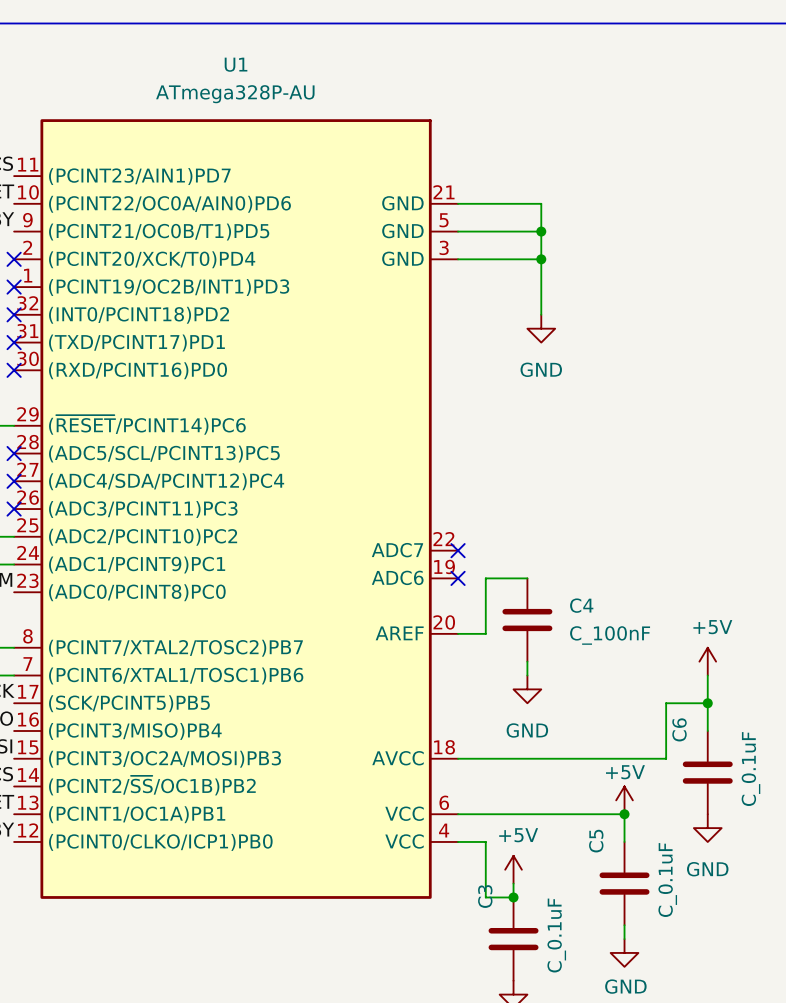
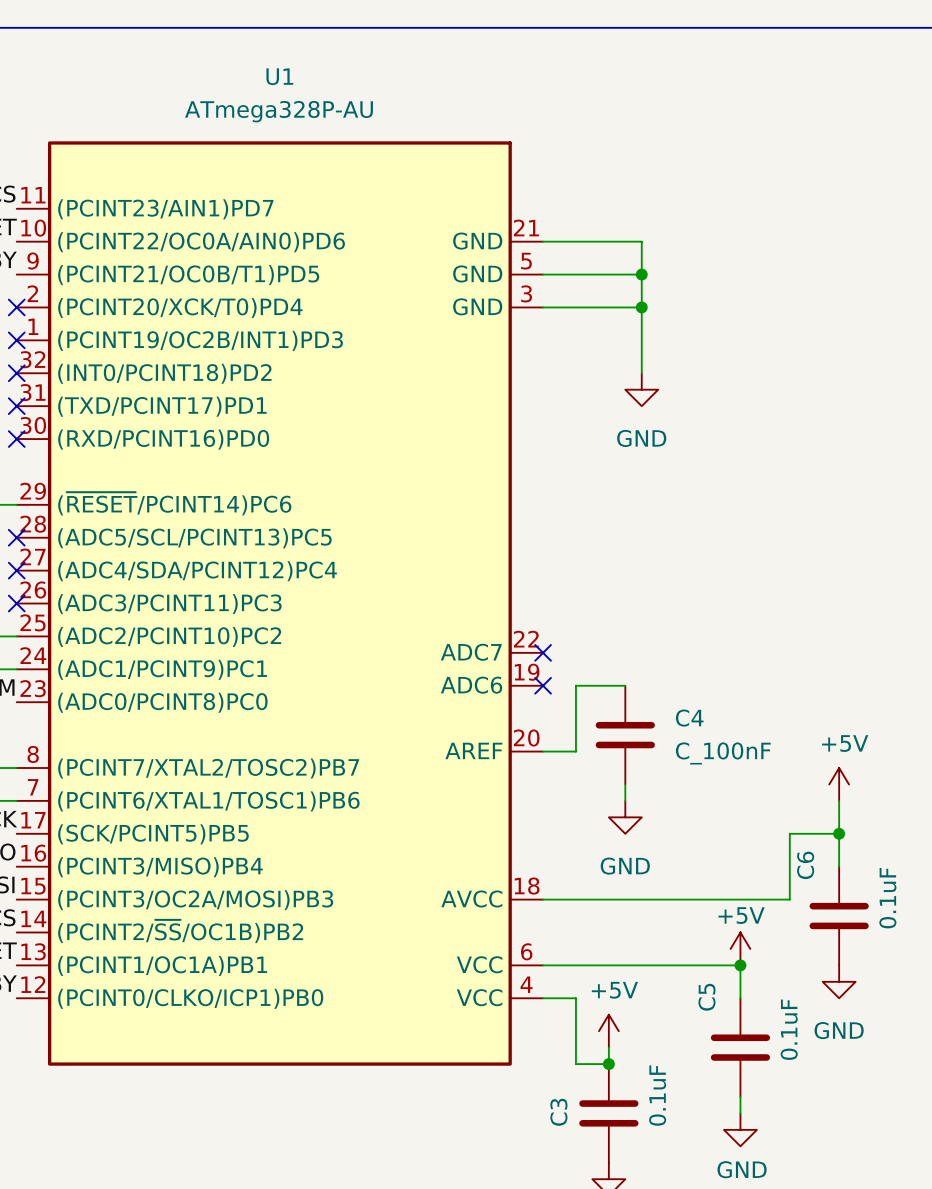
C6 value: C_0.1uF (750, 769) -> 0.1uF (887, 898)
C5 value: C_0.1uF (667, 880) -> 0.1uF (789, 1029)
C3 name position: C3 (485, 896) -> C3 (558, 1112)
C3 value: C_0.1uF (556, 935) -> 0.1uF (657, 1095)

